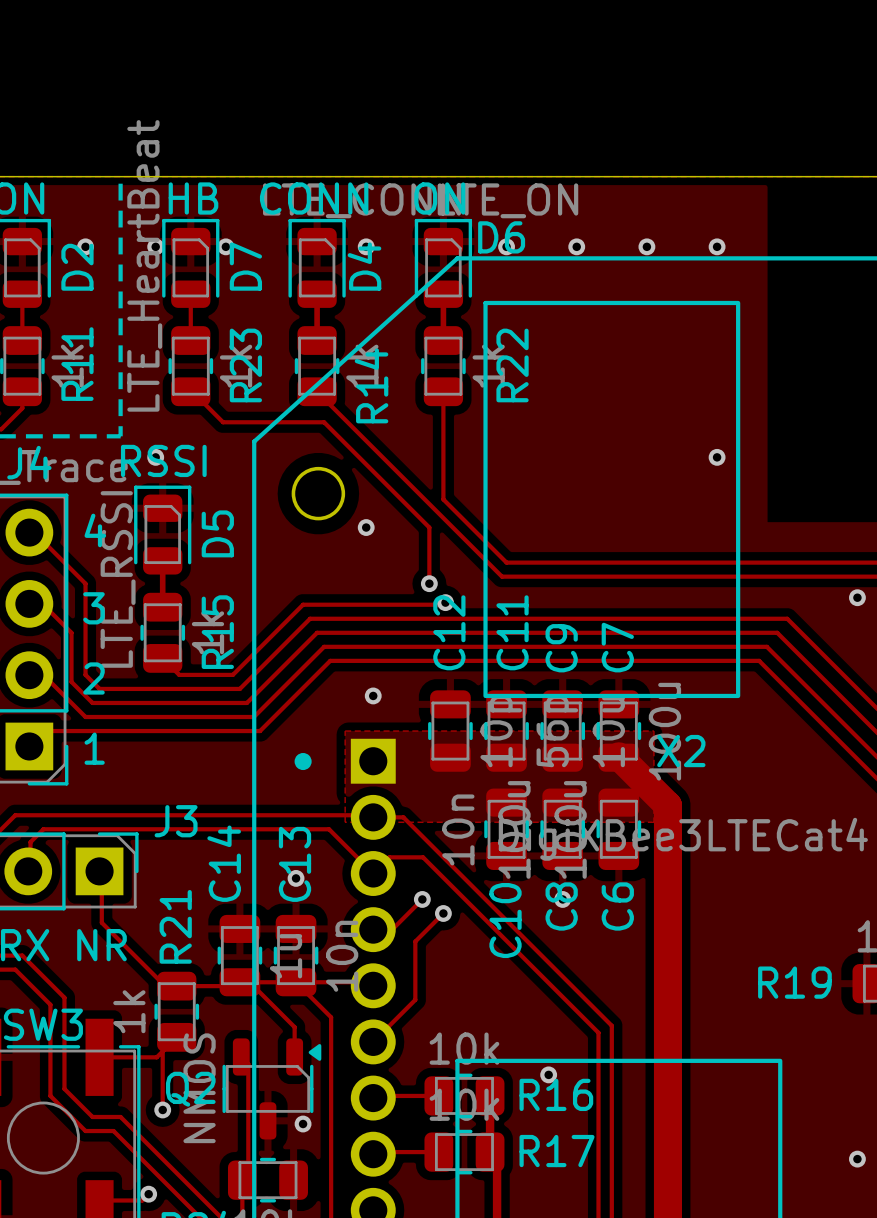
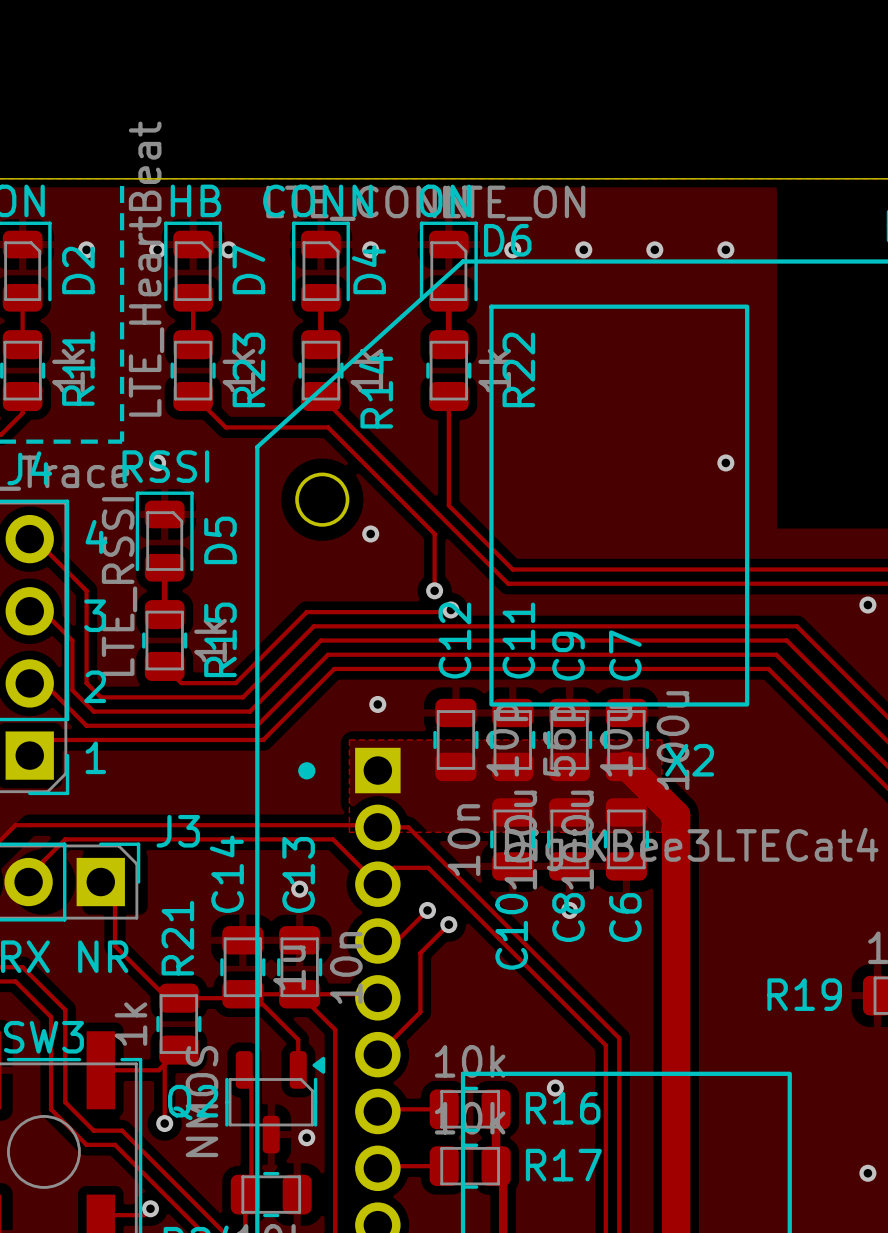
track: (64, 829) (43, 829) (30, 842) (30, 871) -> (65, 839) (42, 861) (42, 882)
track: (101, 871) (101, 922) (113, 934) -> (114, 893) (114, 945)

